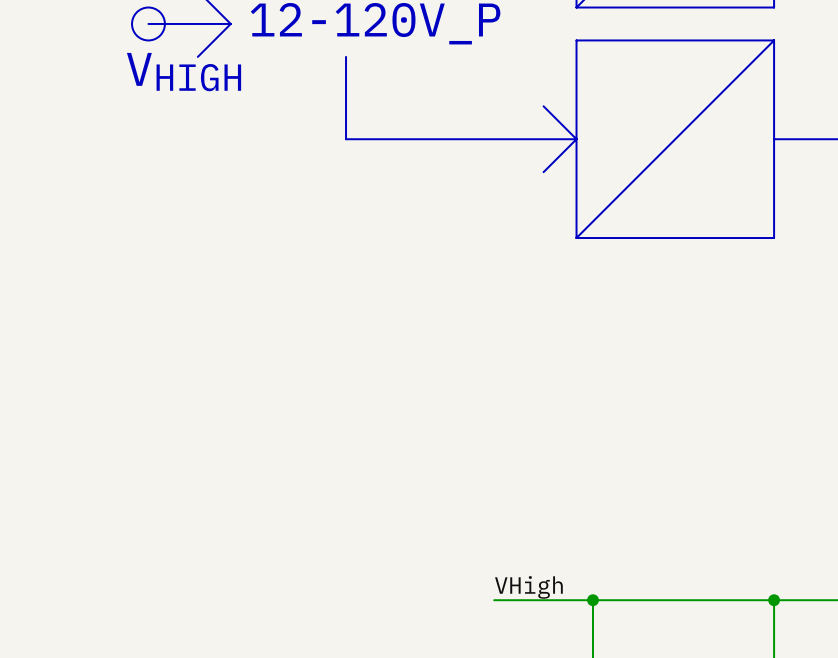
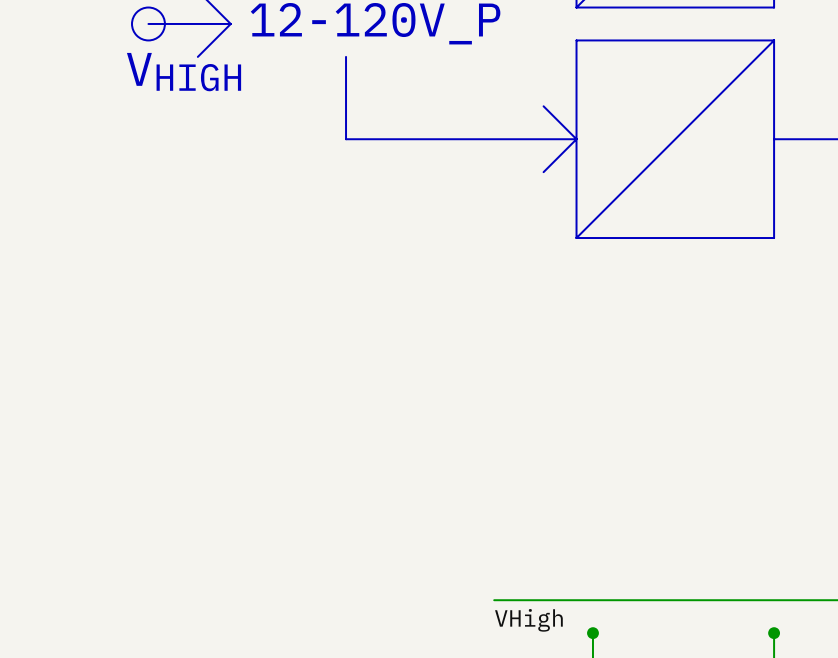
label position: VHigh (528, 587) -> VHigh (528, 620)
wire: (592, 600) (592, 633) -> none
junction position: (592, 600) -> (592, 633)
wire: (774, 600) (774, 633) -> none
junction position: (774, 600) -> (774, 633)

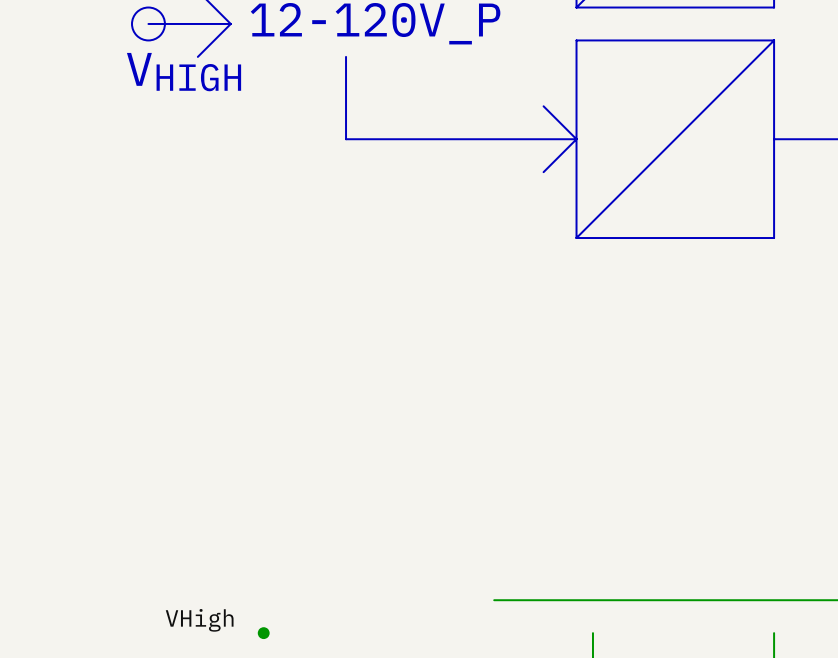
label: none -> VHigh (199, 620)
label: VHigh (528, 620) -> none
junction: none -> (263, 633)
junction: (592, 633) -> none
junction: (774, 633) -> none

